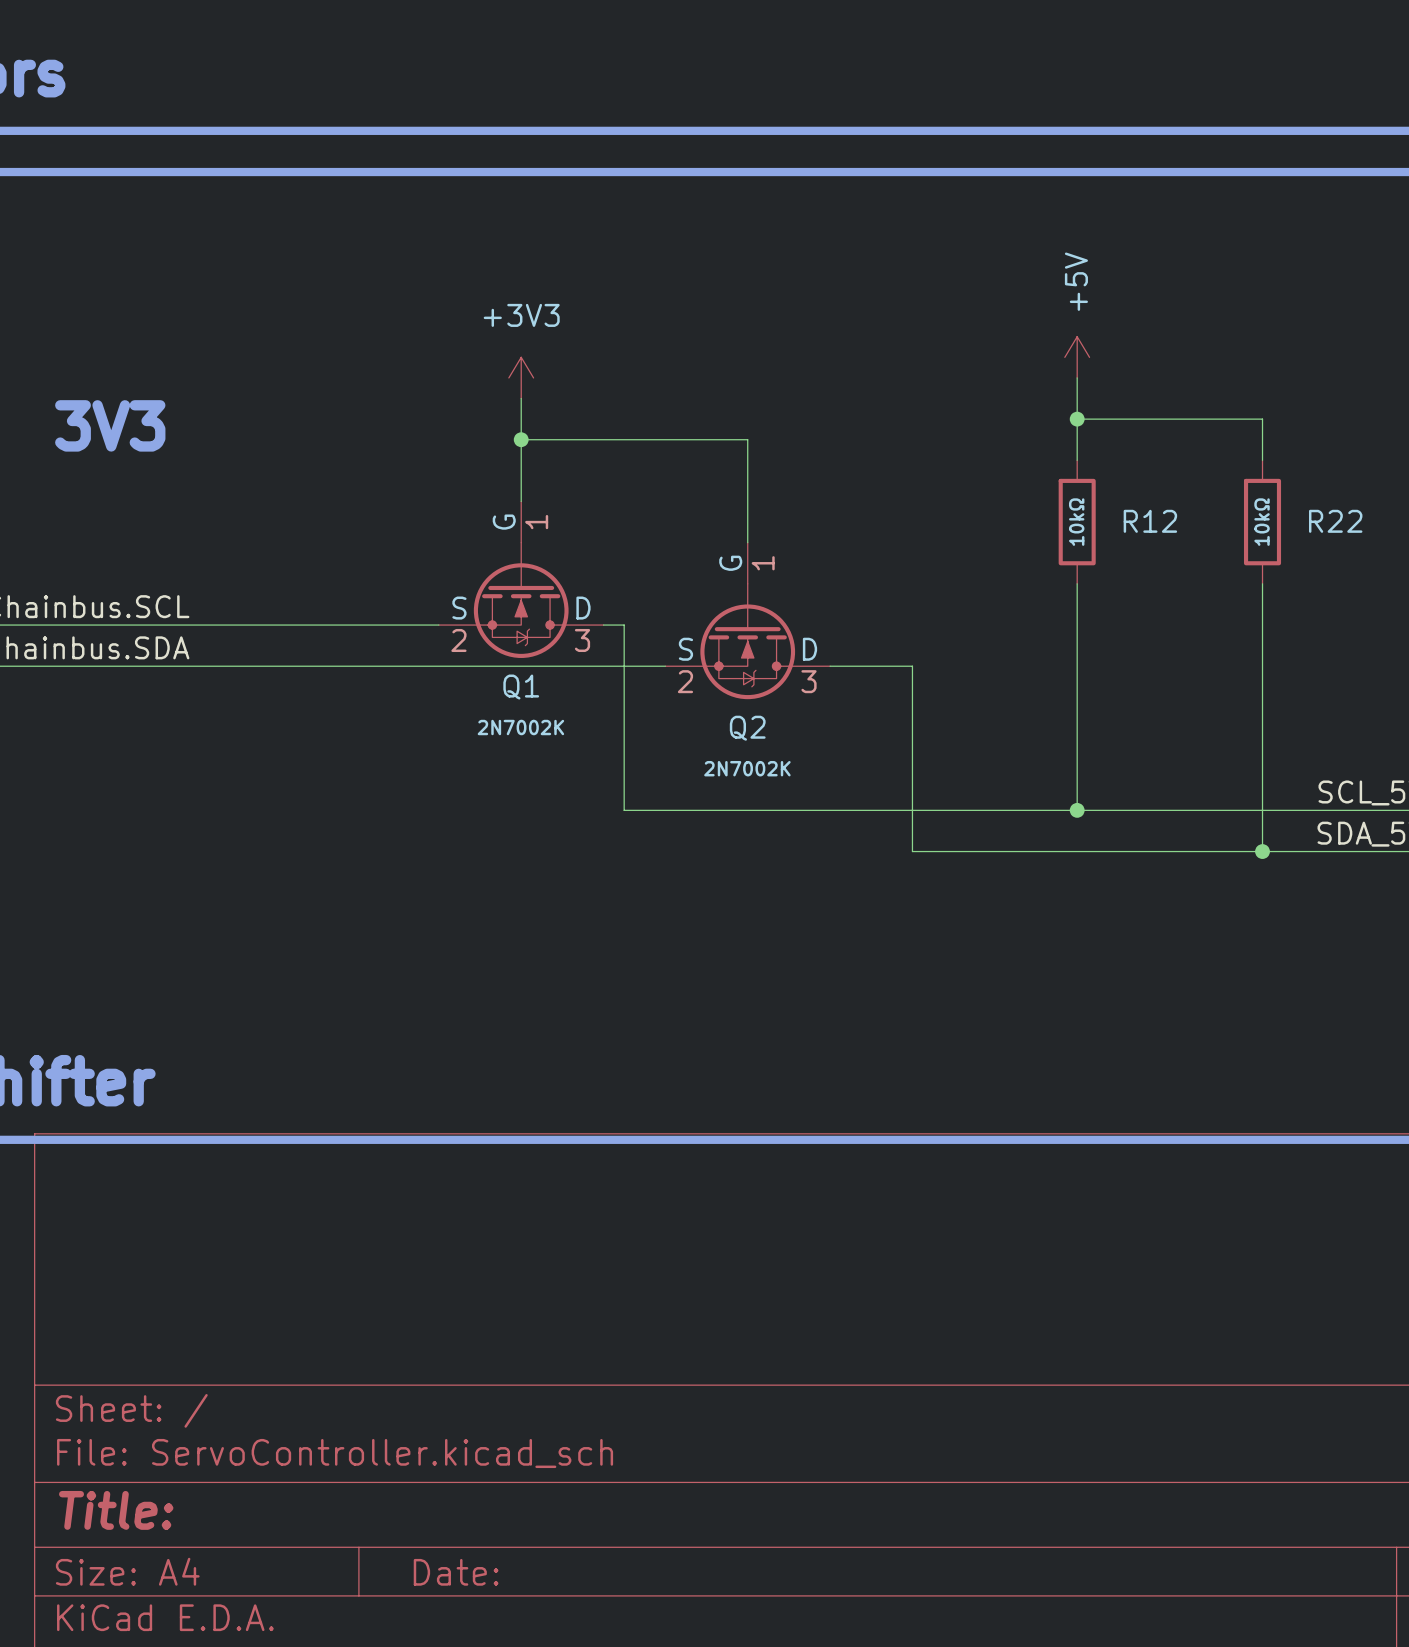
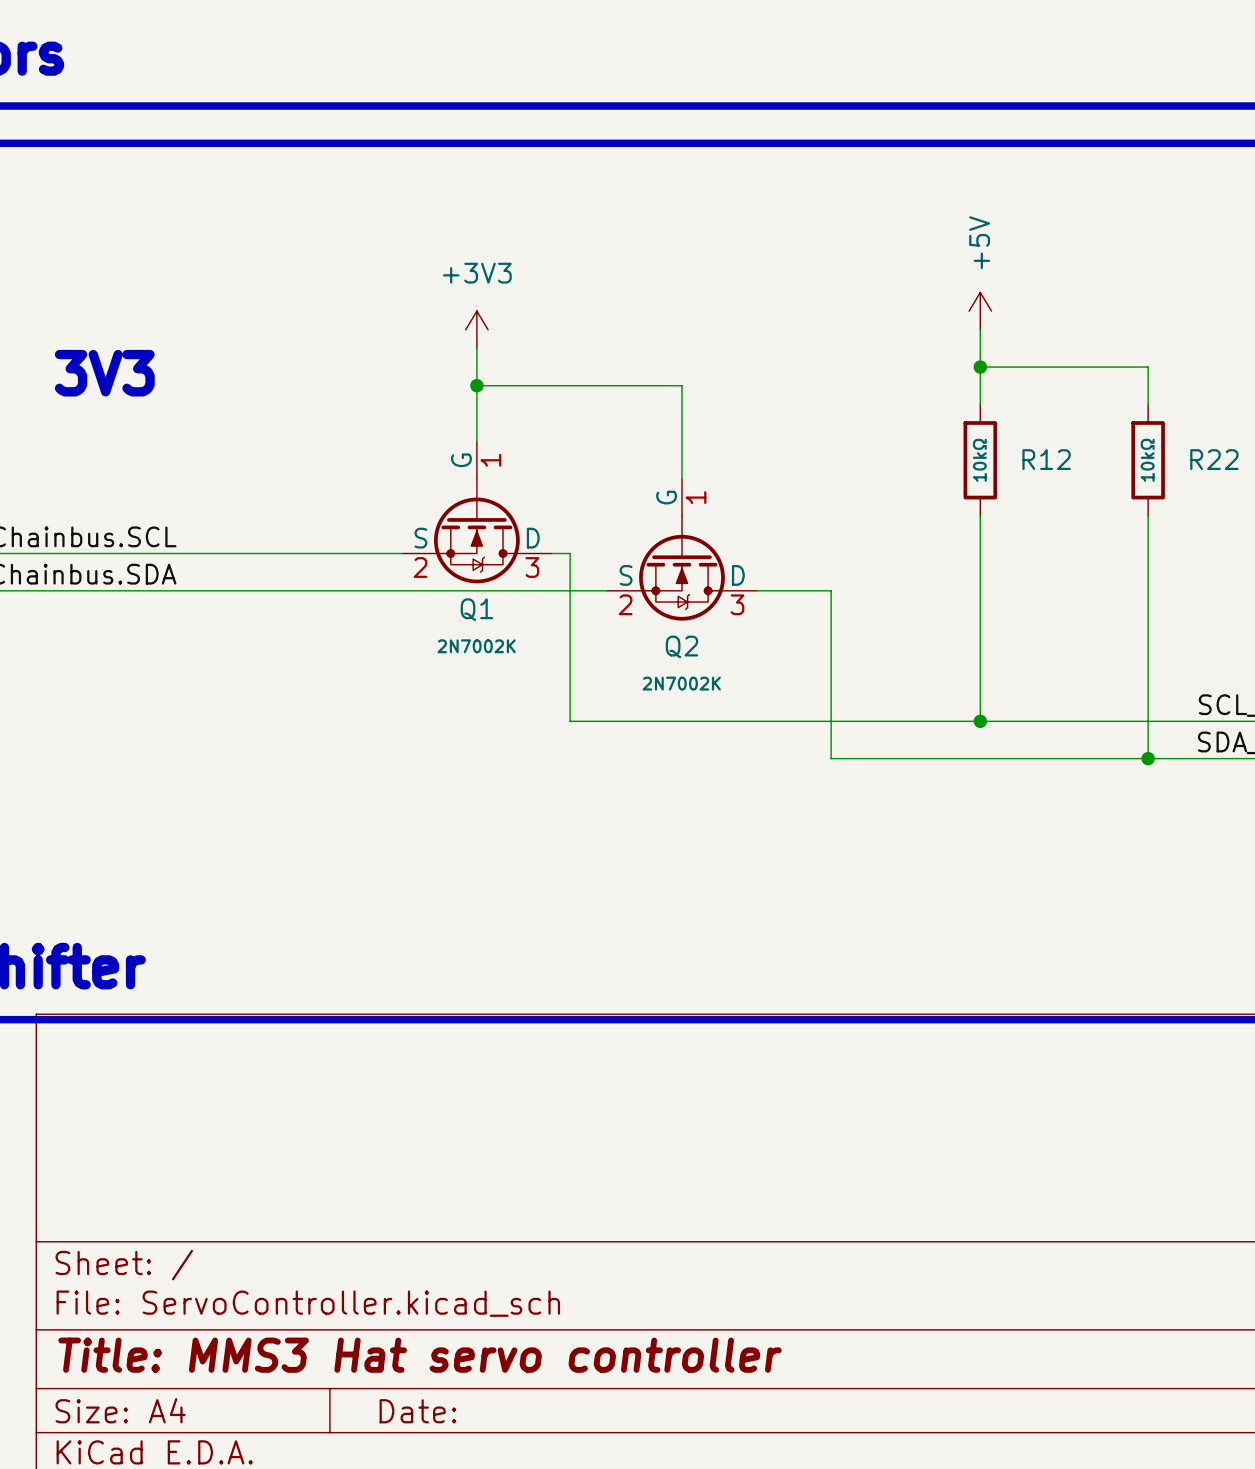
title block: Title: (116, 1510) -> Title: MMS3 Hat servo controller (420, 1355)

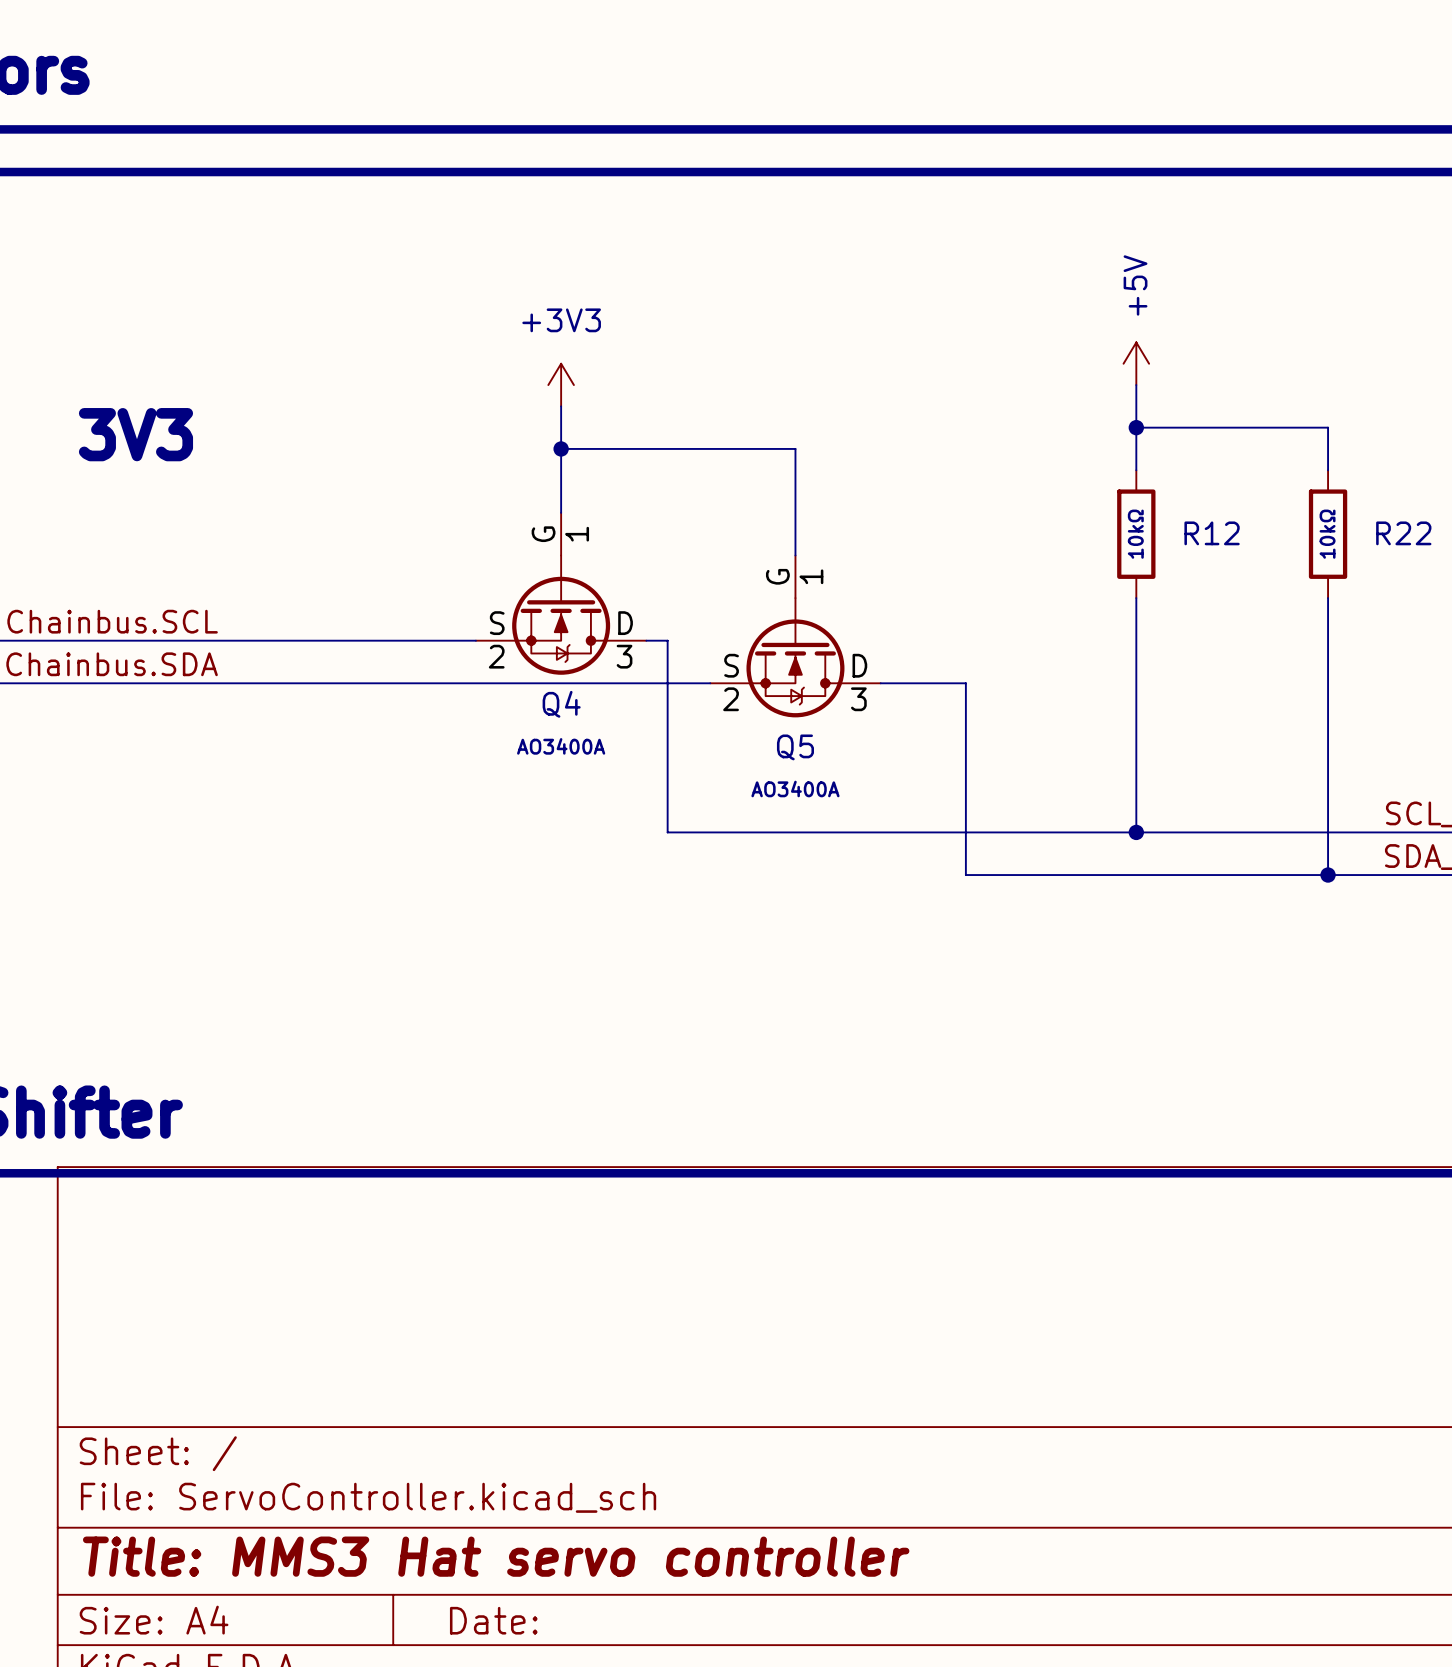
Q1 name: Q1 (476, 609) -> Q4 (561, 704)
Q1 value: 2N7002K (476, 646) -> AO3400A (561, 746)
Q2 name: Q2 (681, 646) -> Q5 (795, 747)
Q2 value: 2N7002K (681, 683) -> AO3400A (795, 788)

